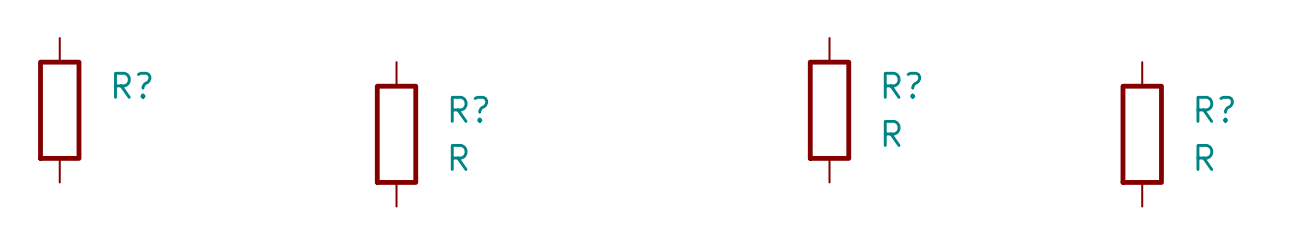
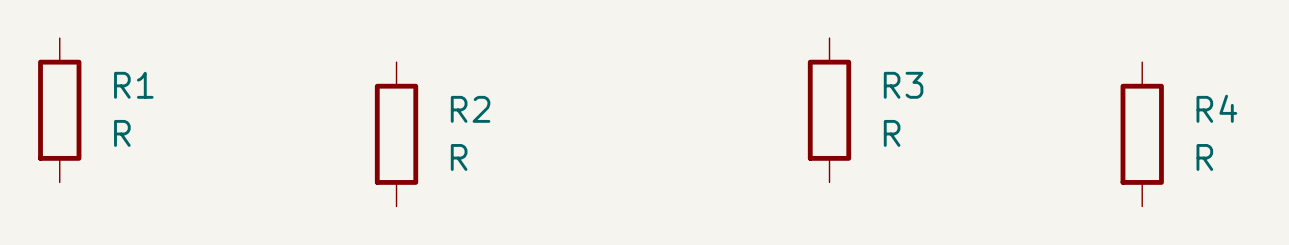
R? name: R? (132, 85) -> R1 (133, 85)
R? name: R? (902, 85) -> R3 (903, 85)
R? name: R? (469, 109) -> R2 (470, 109)
R? name: R? (1215, 109) -> R4 (1216, 108)
R? value: none -> R (122, 133)

